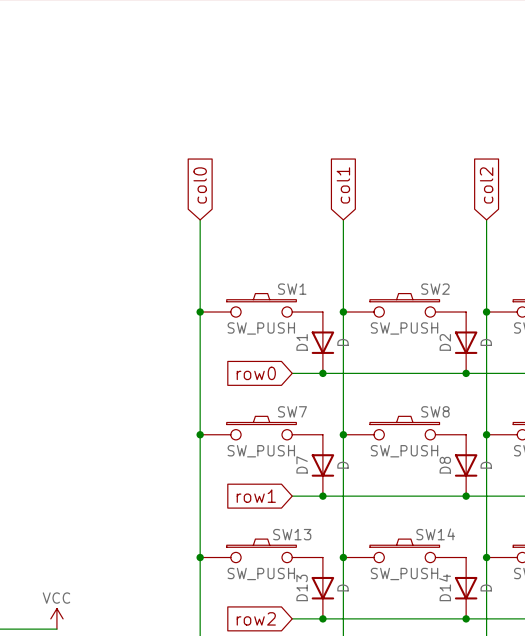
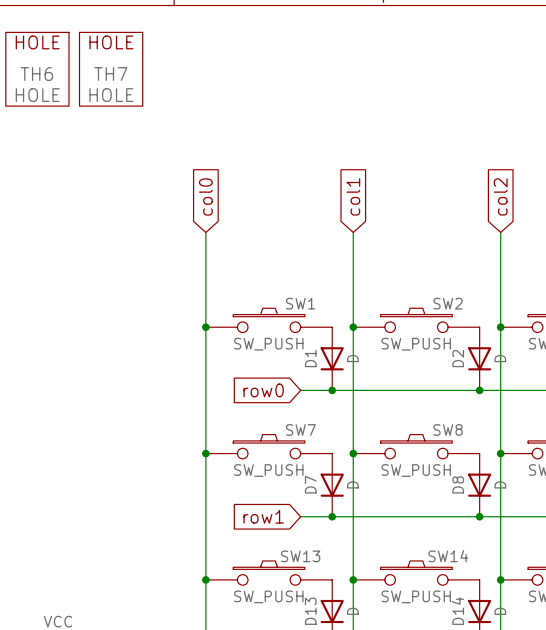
TH6: none -> HOLE (37, 69)
TH7: none -> HOLE (111, 69)

